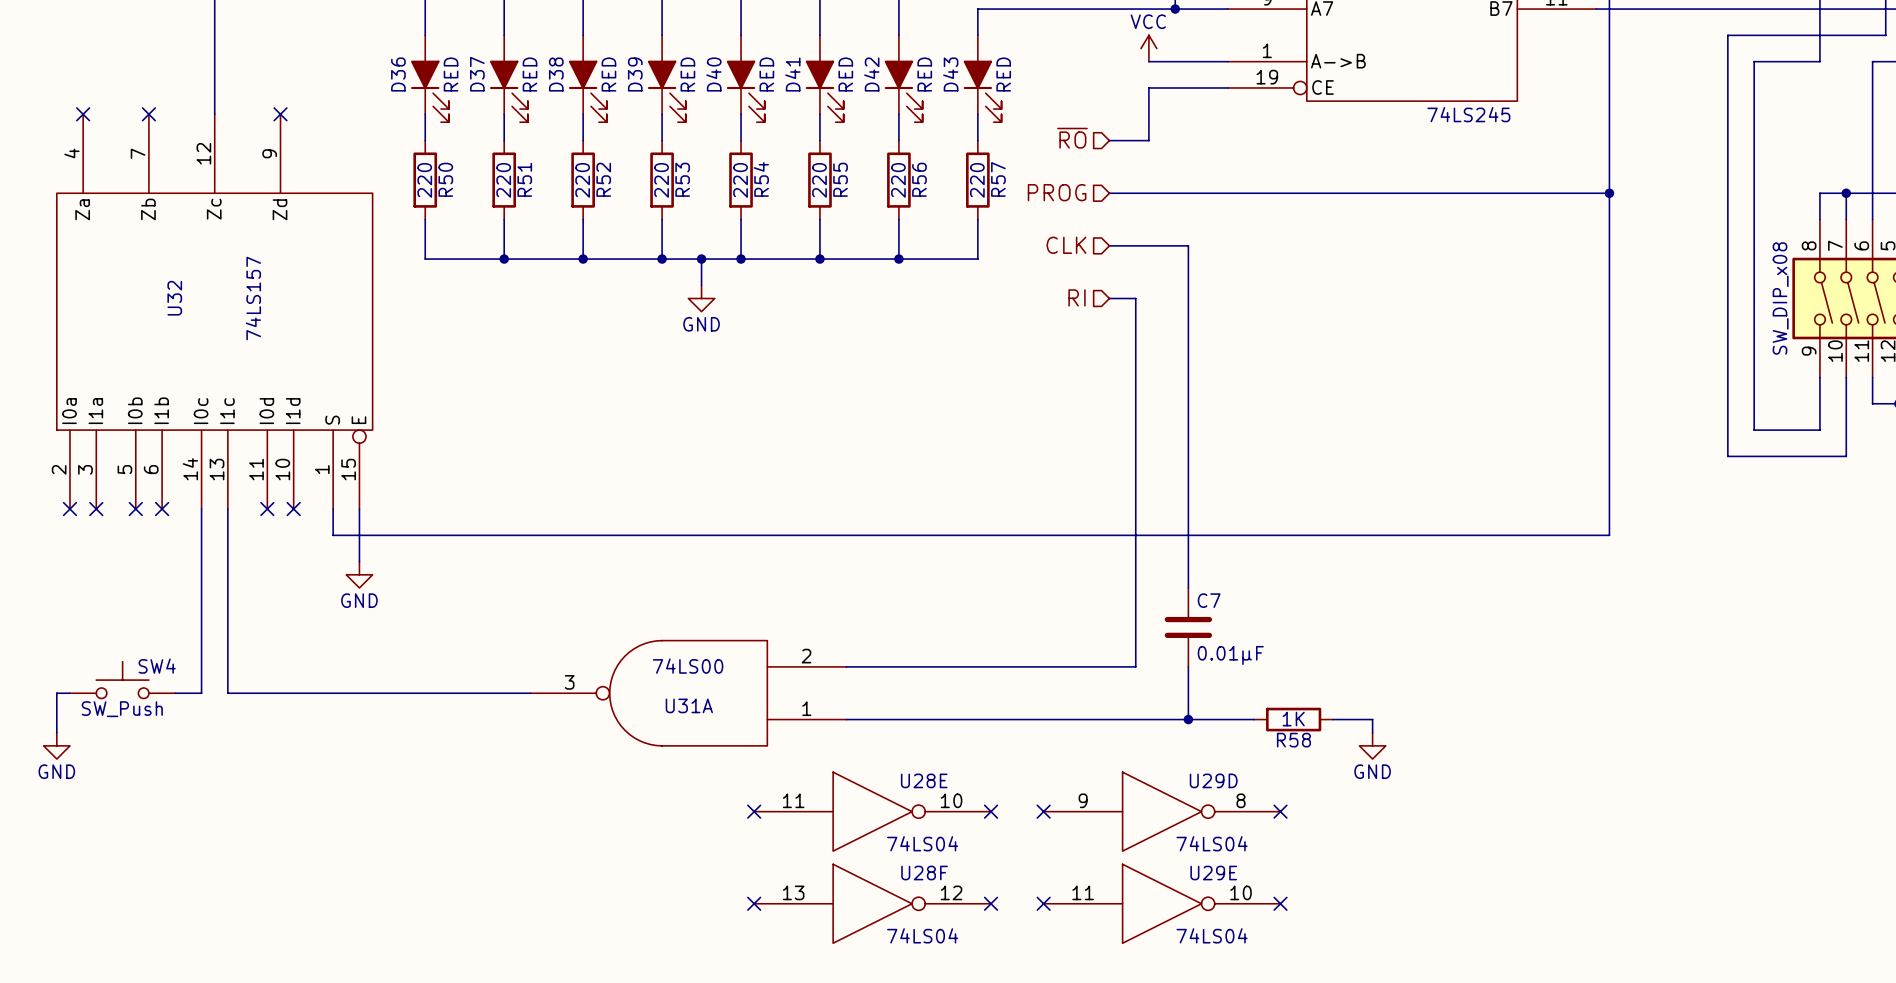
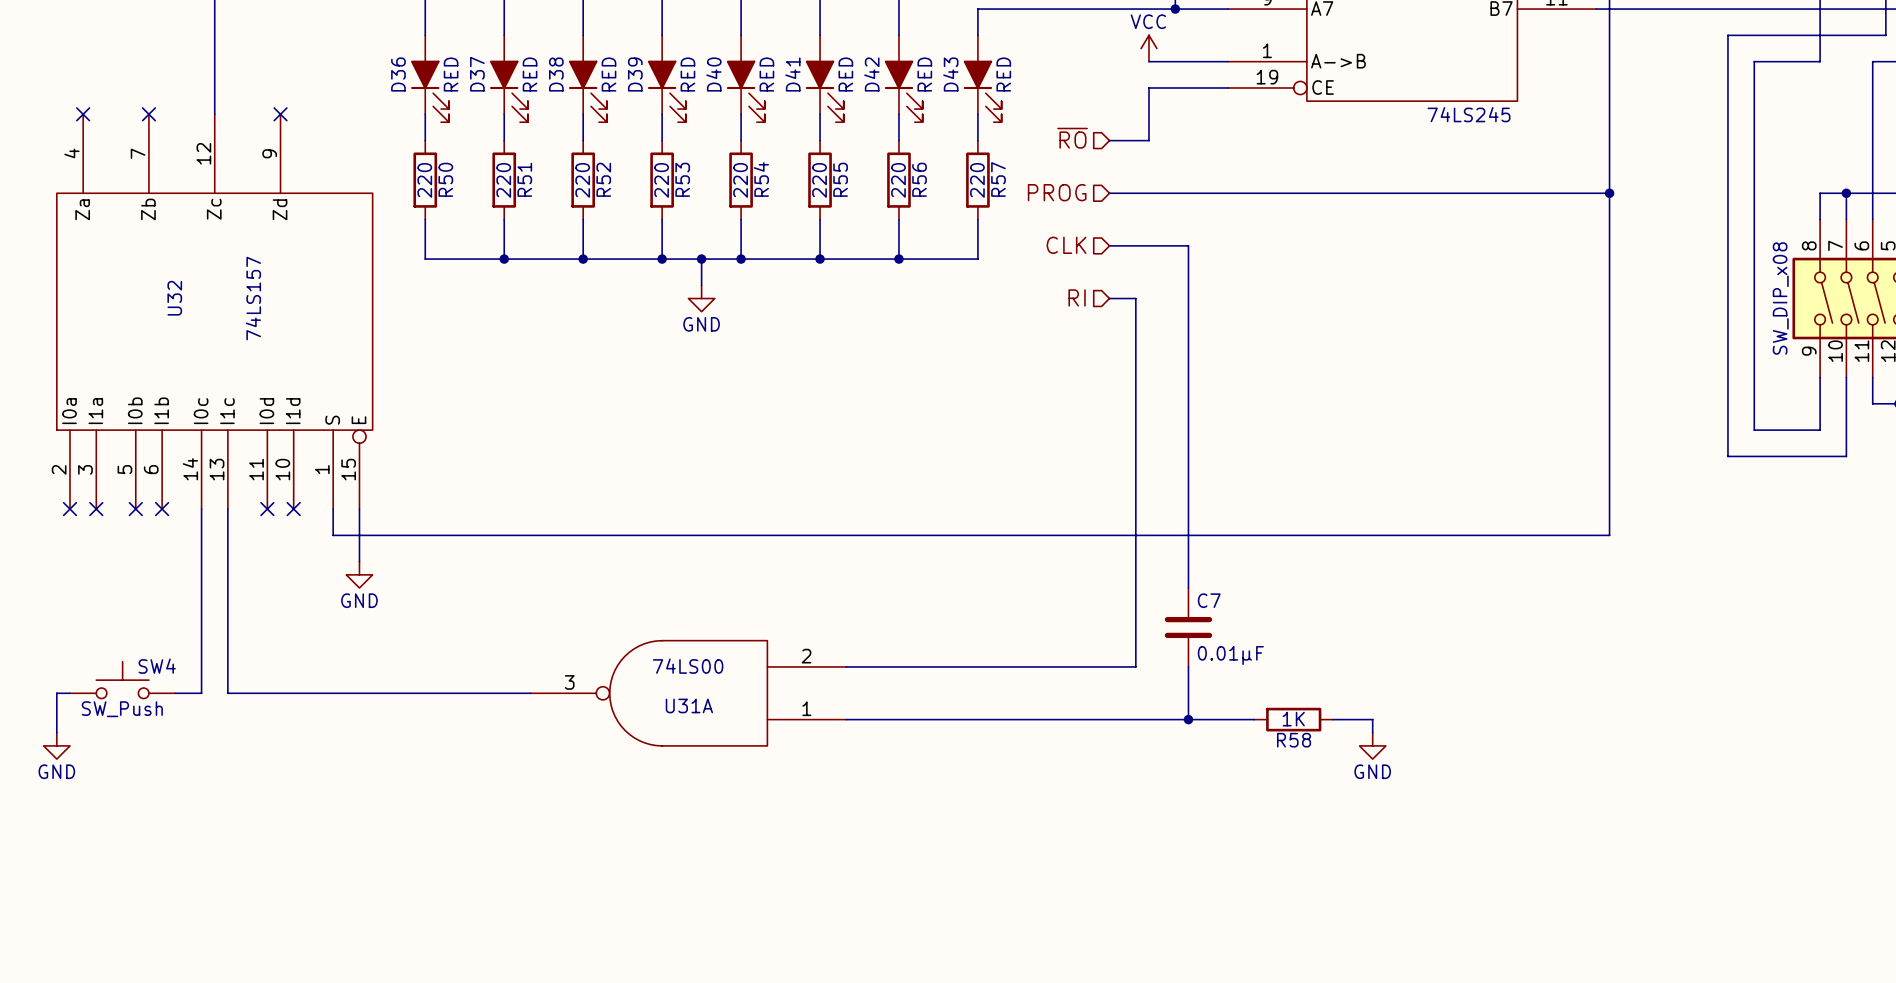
no-connect mark: (754, 811) -> none
U28E: 74LS04 (872, 811) -> none
no-connect mark: (991, 811) -> none
no-connect mark: (1043, 811) -> none
U29D: 74LS04 (1162, 811) -> none
no-connect mark: (1280, 811) -> none
no-connect mark: (754, 903) -> none
U28F: 74LS04 (872, 903) -> none
no-connect mark: (991, 903) -> none
no-connect mark: (1043, 903) -> none
U29E: 74LS04 (1162, 903) -> none
no-connect mark: (1280, 903) -> none

